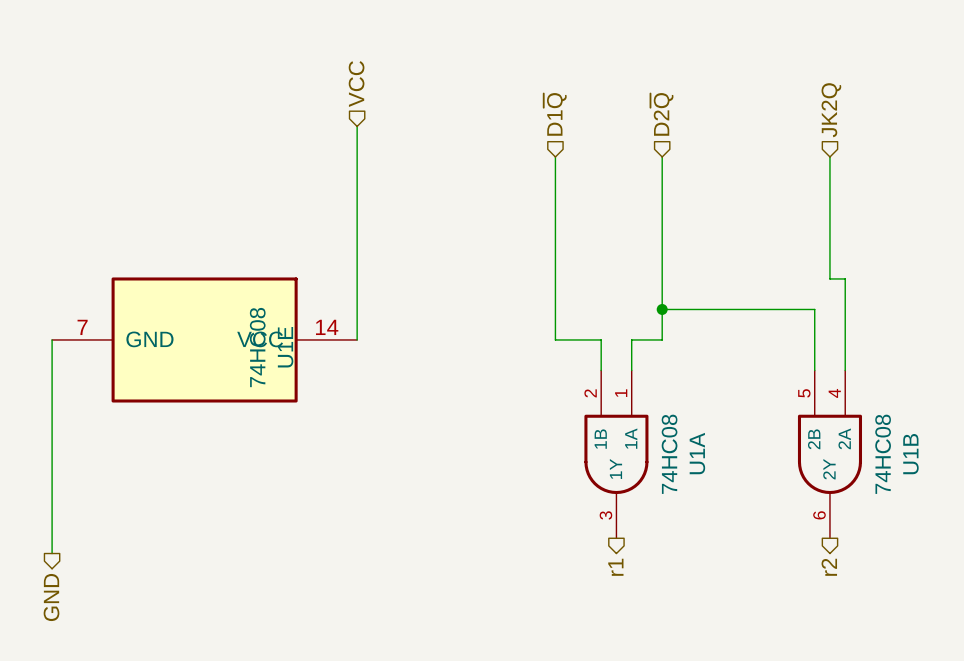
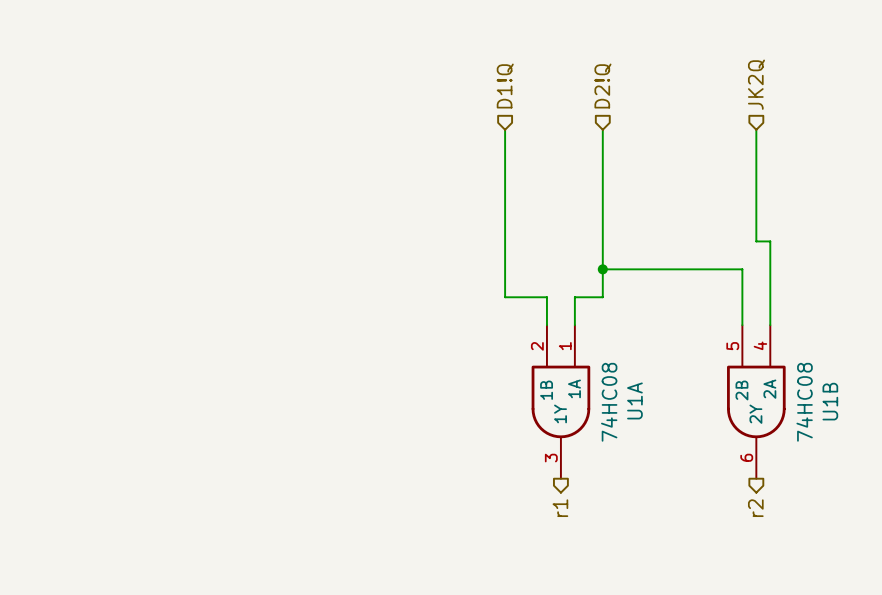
hierarchical label: VCC (356, 84) -> none
hierarchical label: D1~{Q} (555, 114) -> D1!Q (505, 86)
hierarchical label: D2~{Q} (661, 114) -> D2!Q (602, 86)
wire: (357, 126) (357, 339) -> none
wire: (52, 339) (52, 553) -> none
U1E: 74HC08 (204, 339) -> none
hierarchical label: GND (51, 597) -> none

